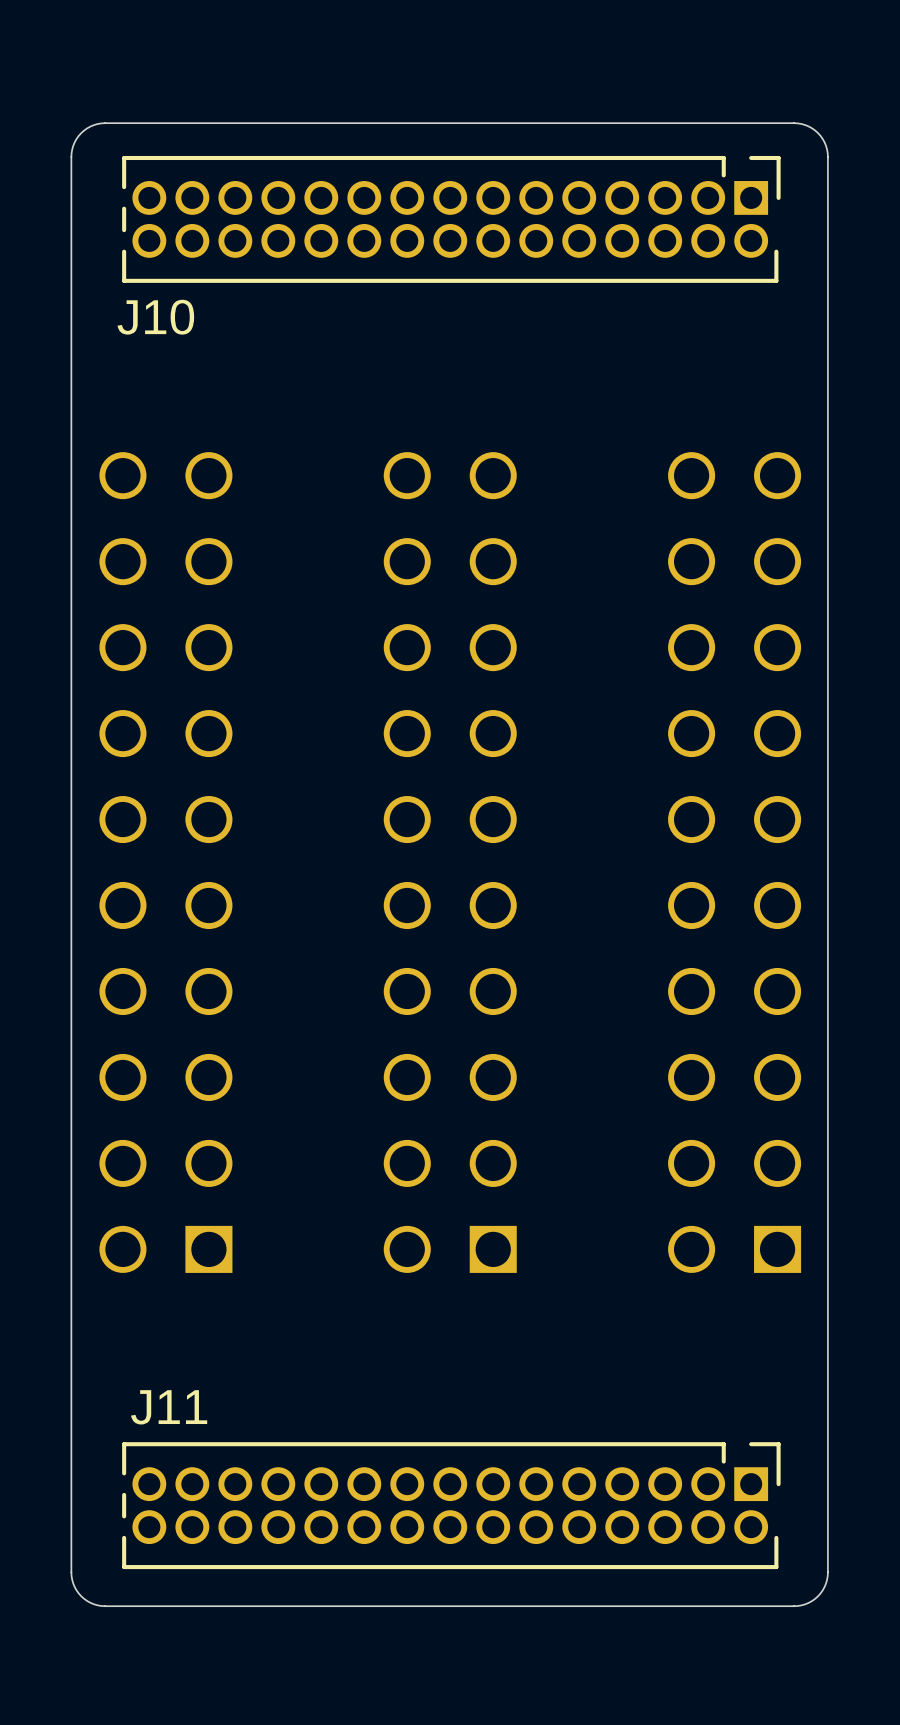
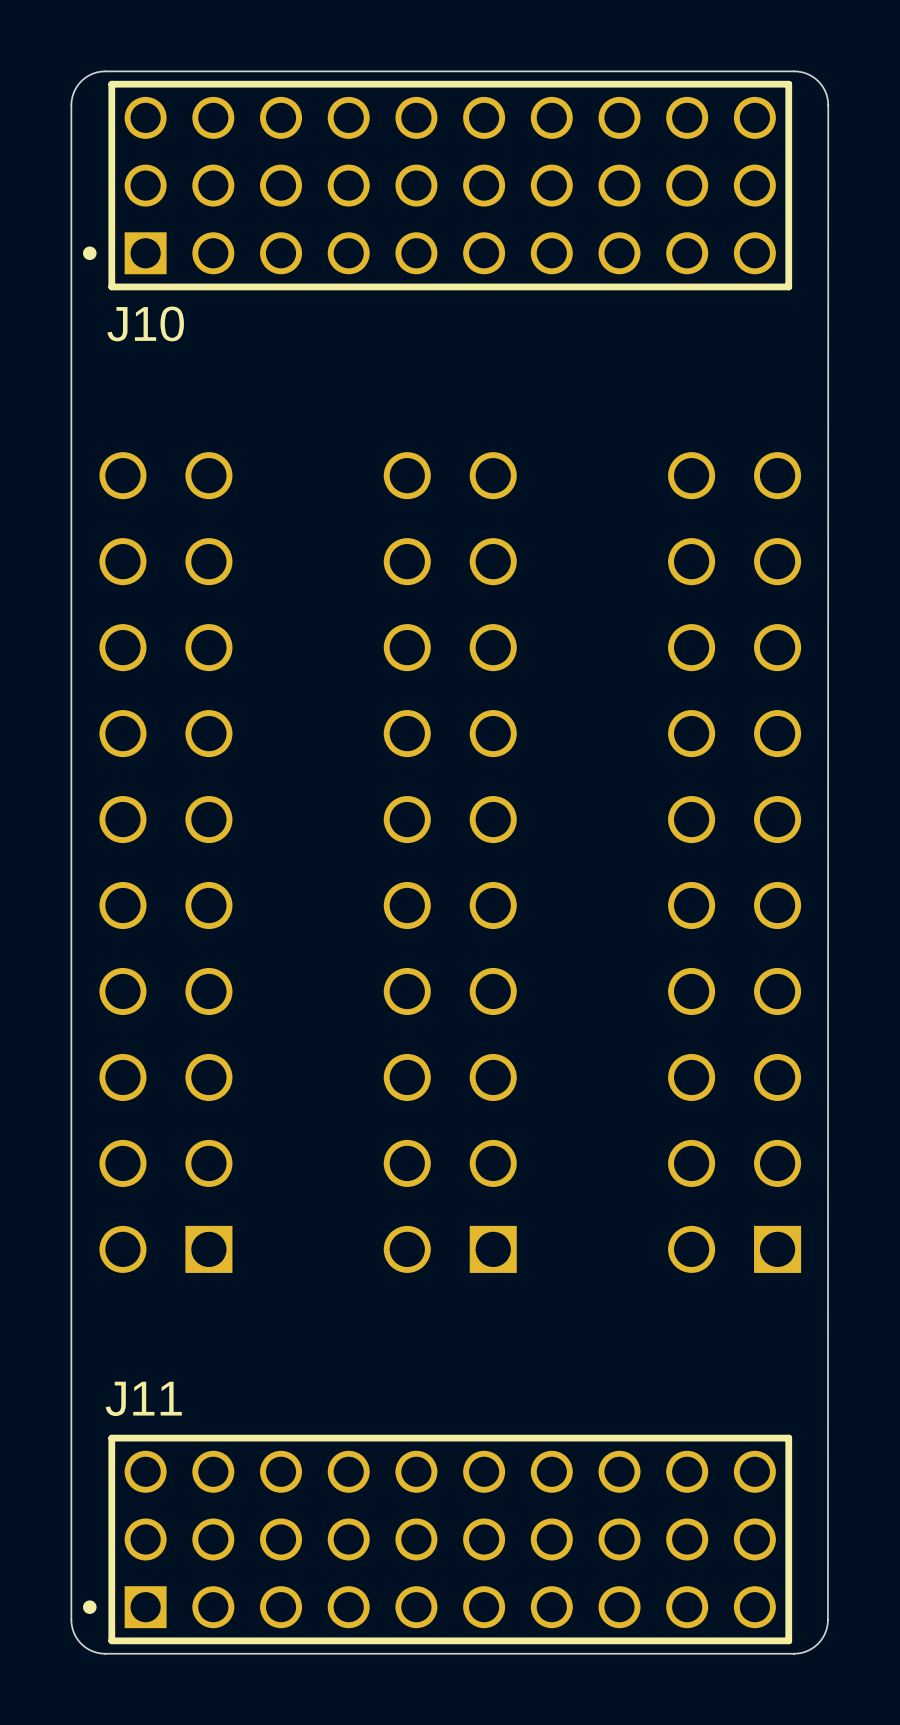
J10 footprint: [122, 155, 781, 283] -> [83, 80, 793, 291]
board edge: (71, 157) (74, 142) (81, 133) (90, 126) (105, 123) (794, 123) (808, 126) (818, 133) (826, 145) (827, 157) (827, 1572) (824, 1587) (812, 1601) (794, 1606) (105, 1606) (94, 1604) (81, 1596) (74, 1587) (71, 1572) -> (71, 157) (71, 105) (73, 94) (84, 78) (101, 71) (794, 71) (805, 73) (815, 78) (824, 90) (828, 101) (827, 1619) (824, 1634) (812, 1648) (794, 1653) (101, 1653) (84, 1646) (73, 1631) (71, 1619) (71, 1572)
J11 footprint: [122, 1442, 781, 1570] -> [83, 1434, 793, 1645]

